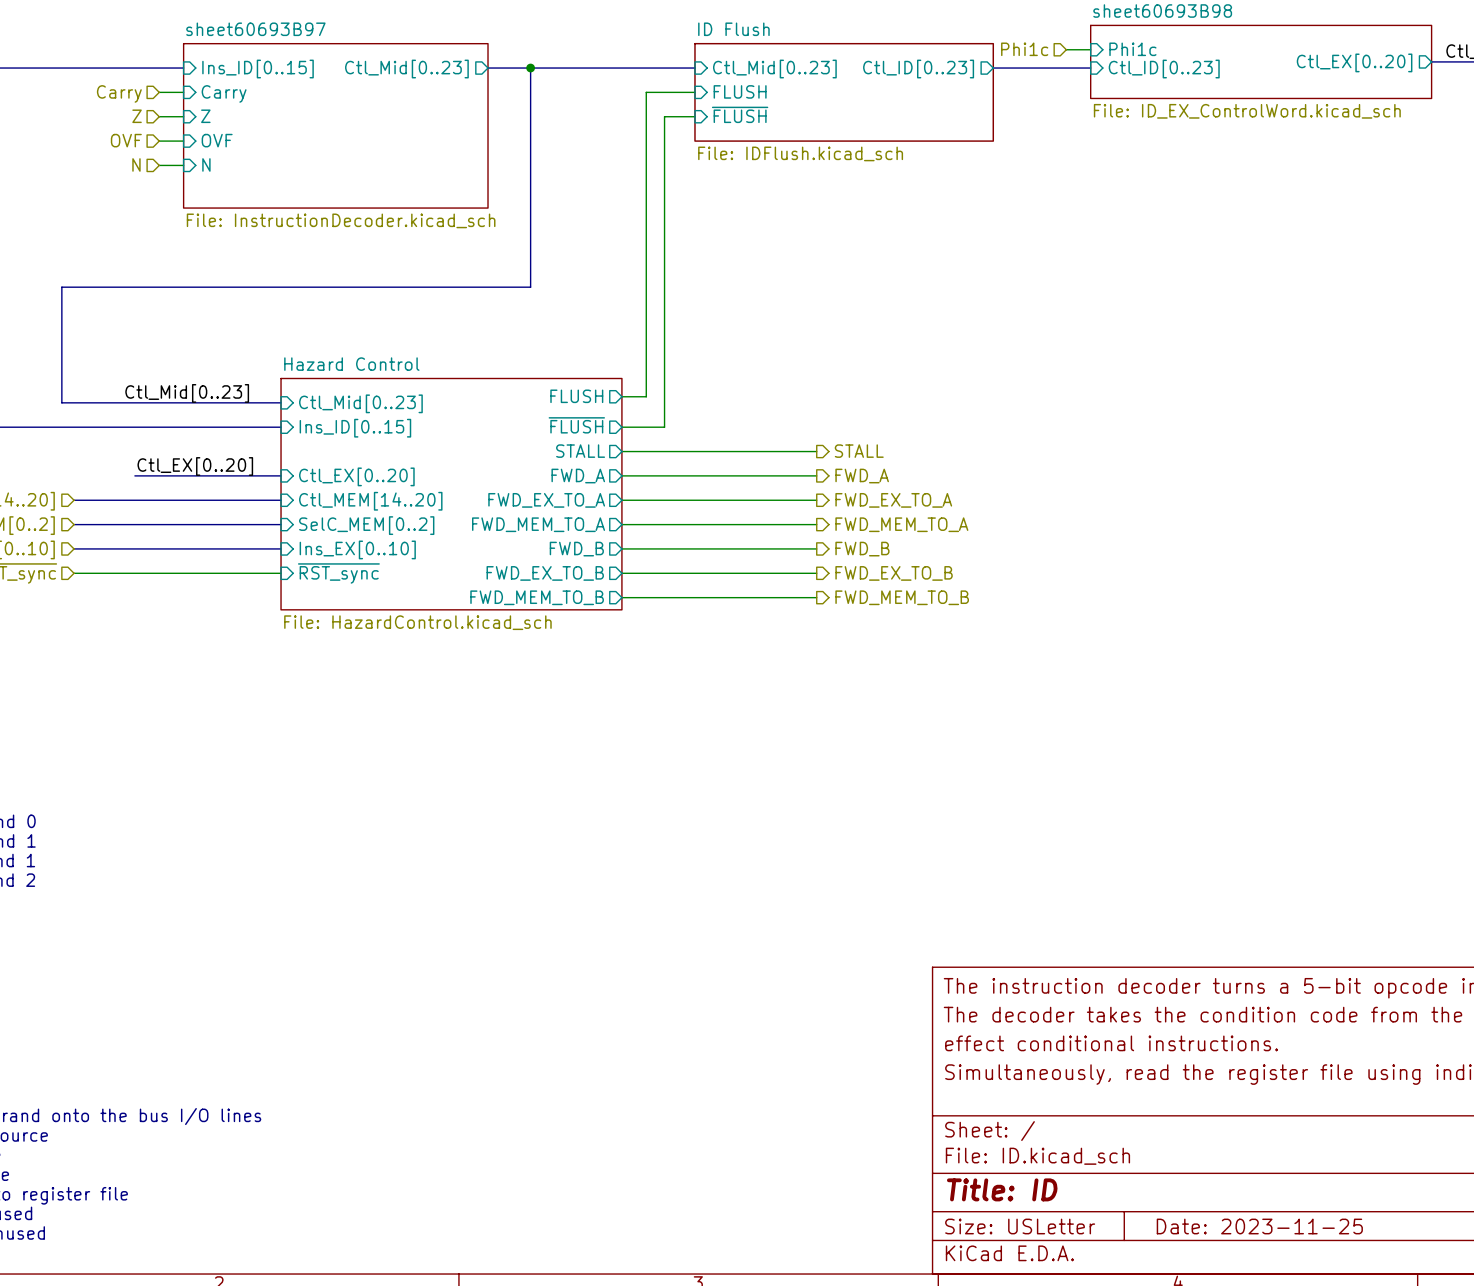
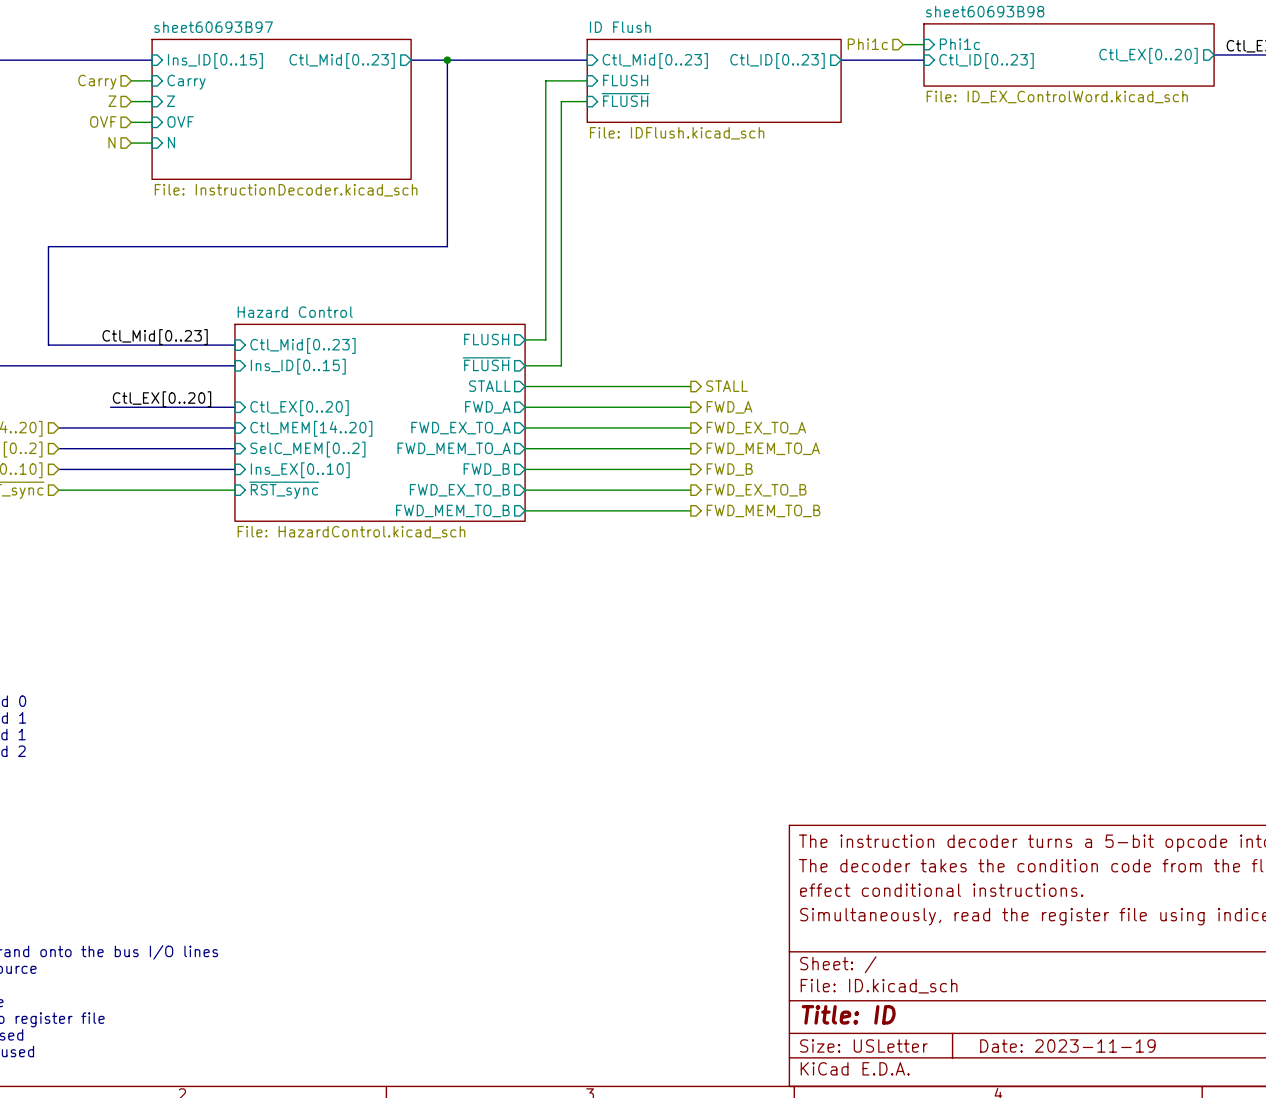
title block: Date: 2023-11-25 (1259, 1226) -> Date: 2023-11-19 (1067, 1045)

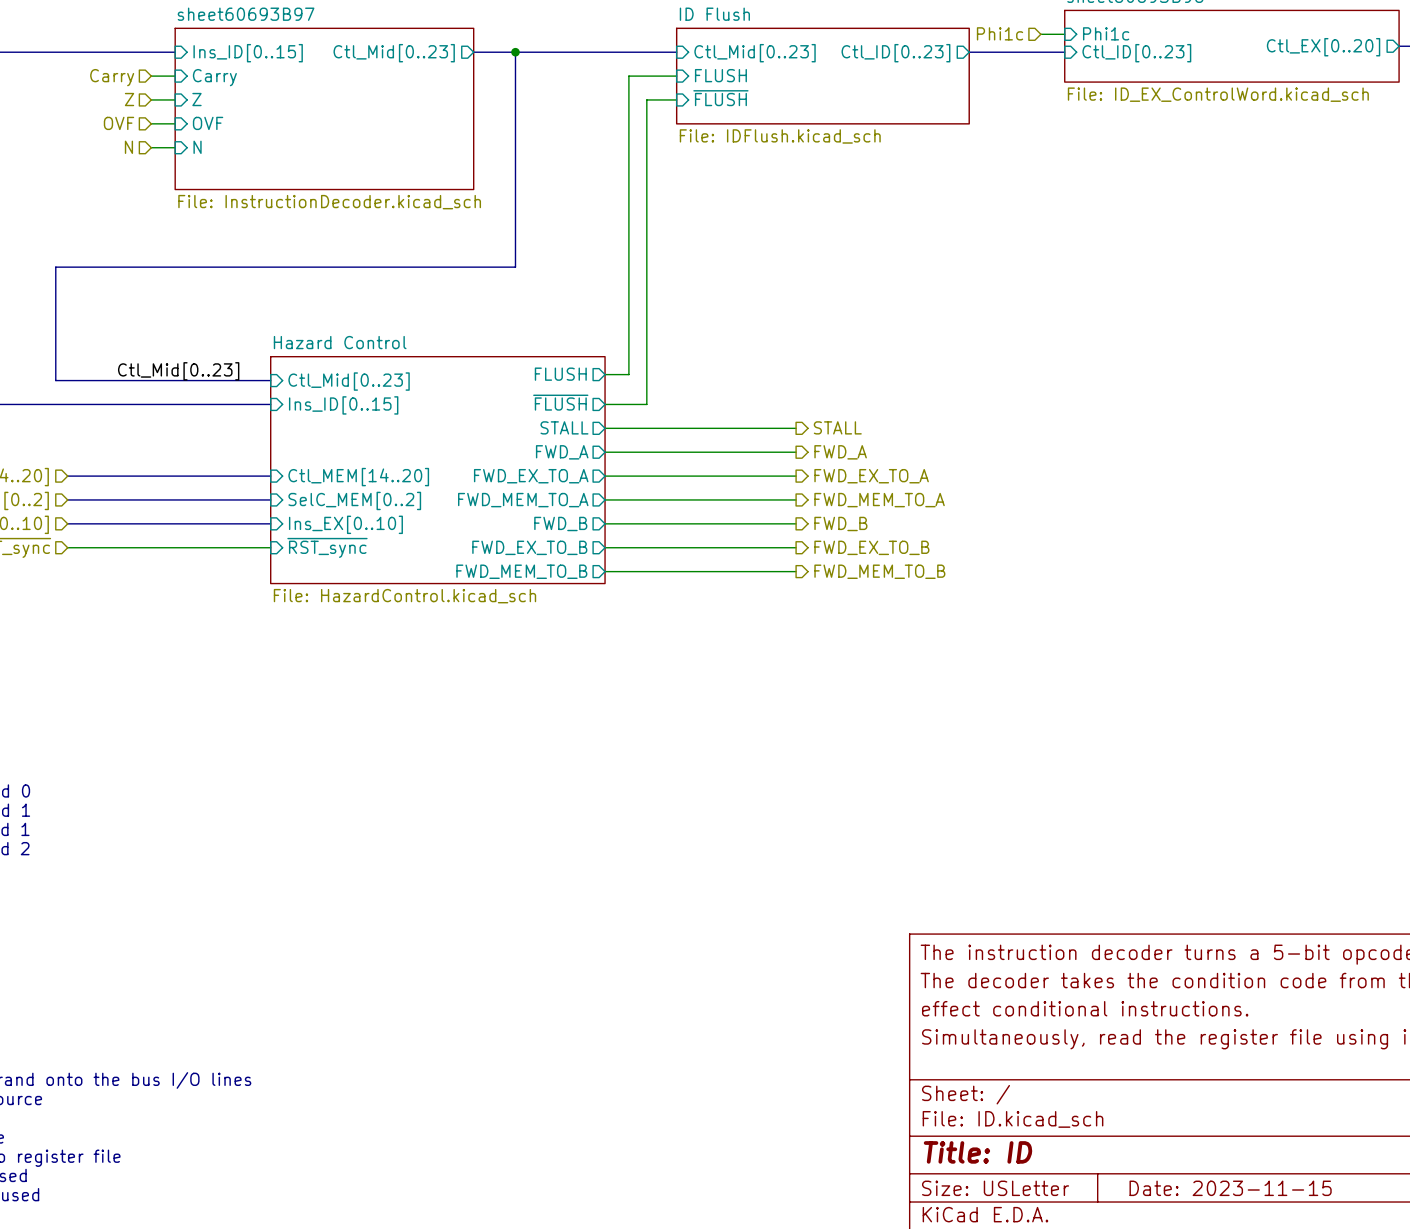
label: Ctl_EX[0..20] (162, 399) -> none
bus: (110, 407) (234, 407) -> none
sheet pin: Ctl_EX[0..20] (299, 408) -> none
title block: Date: 2023-11-19 (1067, 1045) -> Date: 2023-11-15 (1230, 1188)

